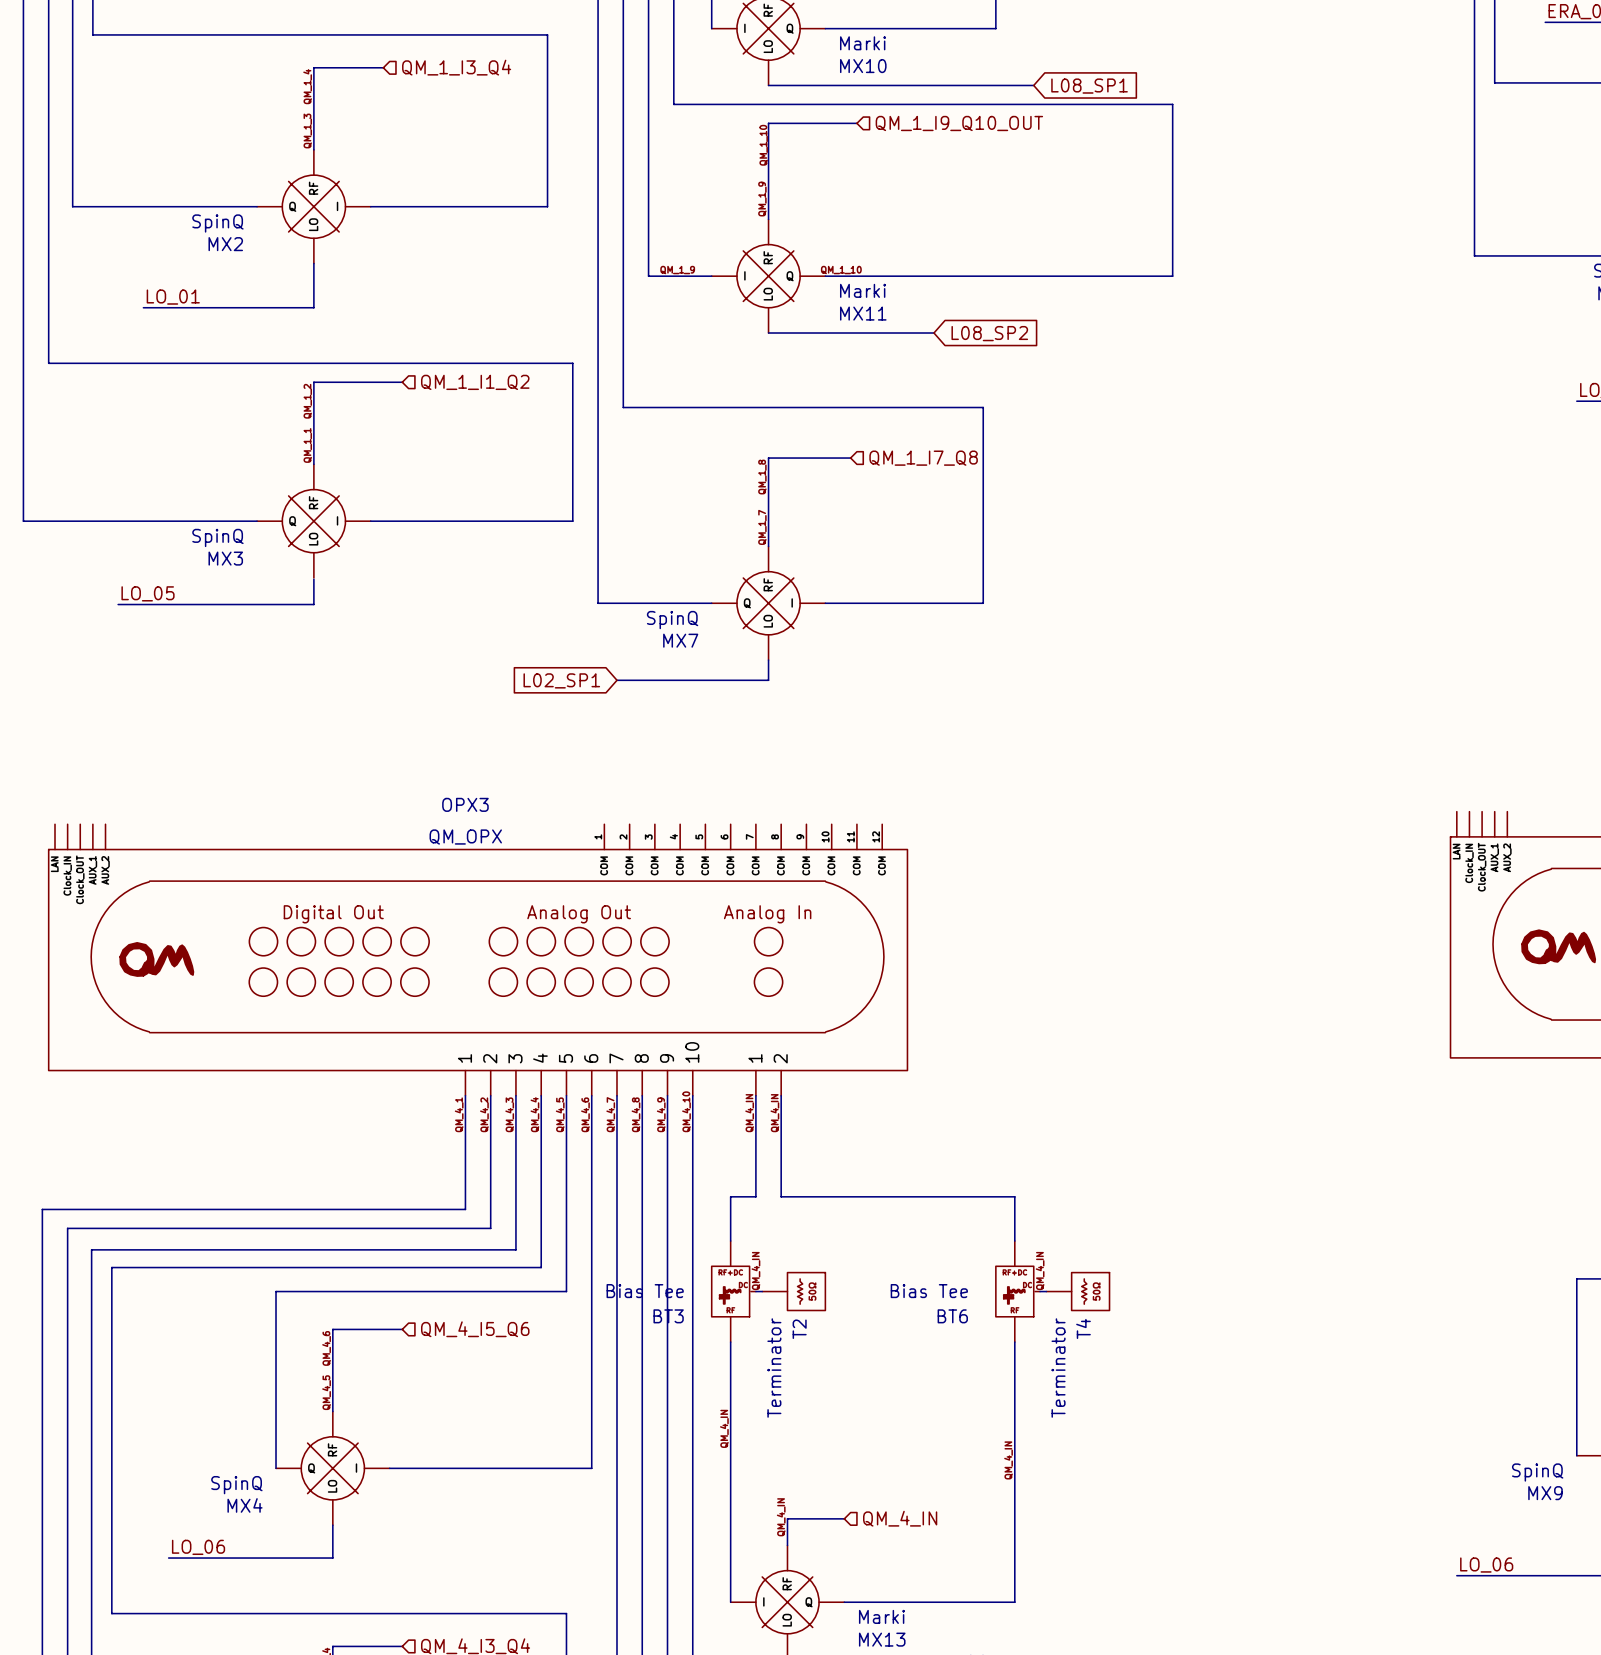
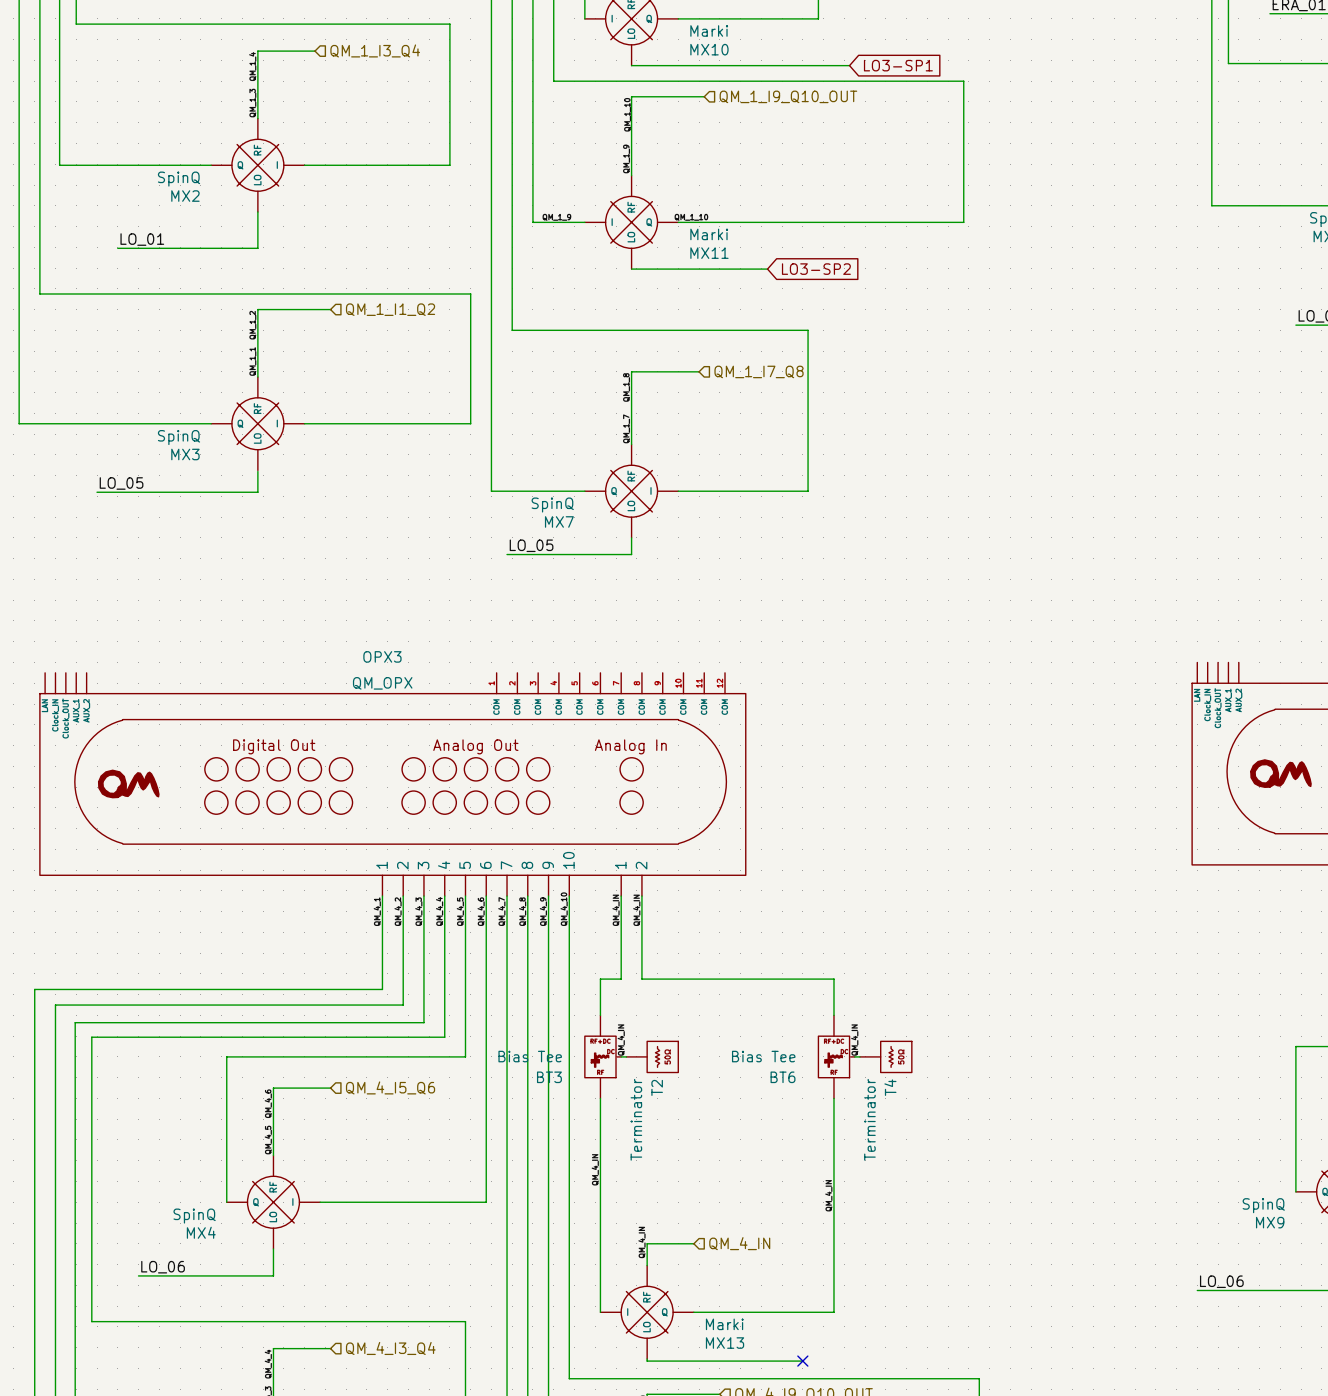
global label: L08_SP1 (1089, 86) -> LO3-SP1 (898, 65)
global label: L08_SP2 (989, 333) -> LO3-SP2 (816, 269)
label: none -> LO_05 (531, 545)
global label: L02_SP1 (561, 680) -> none

